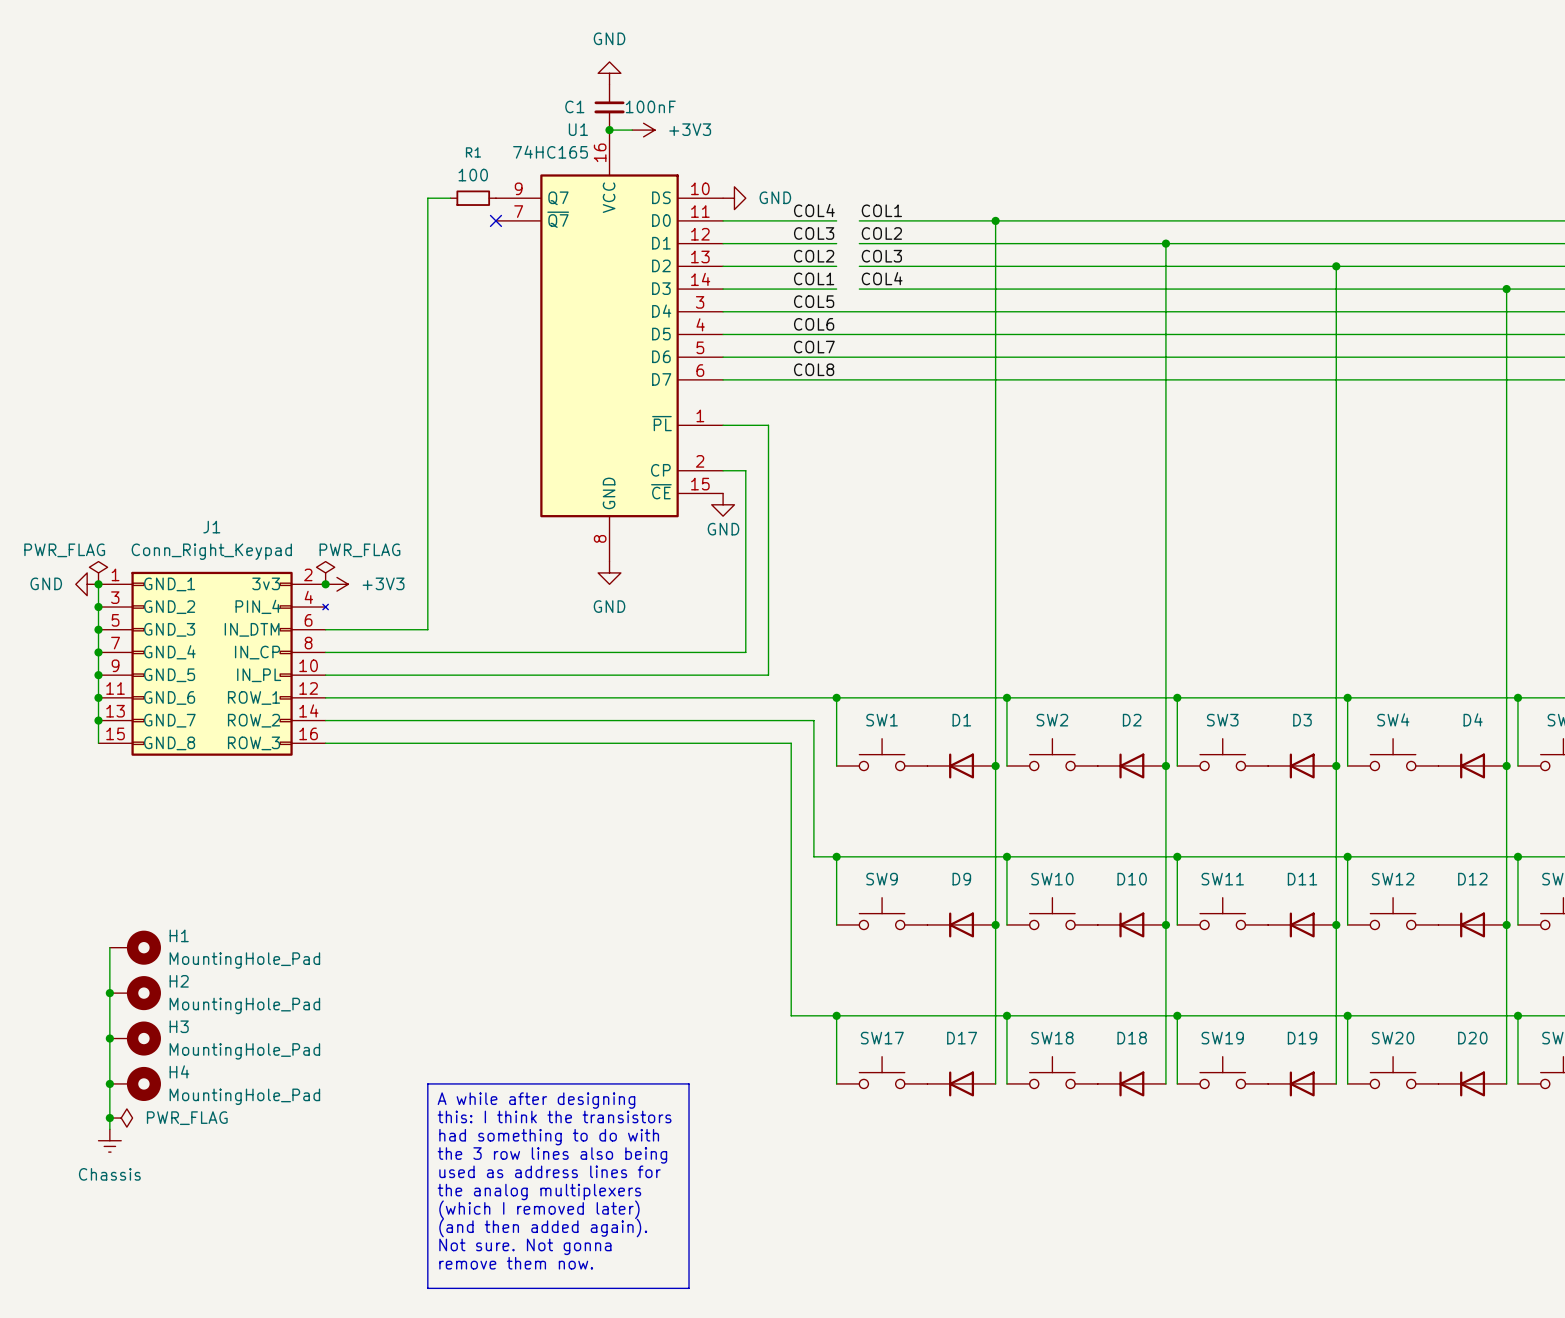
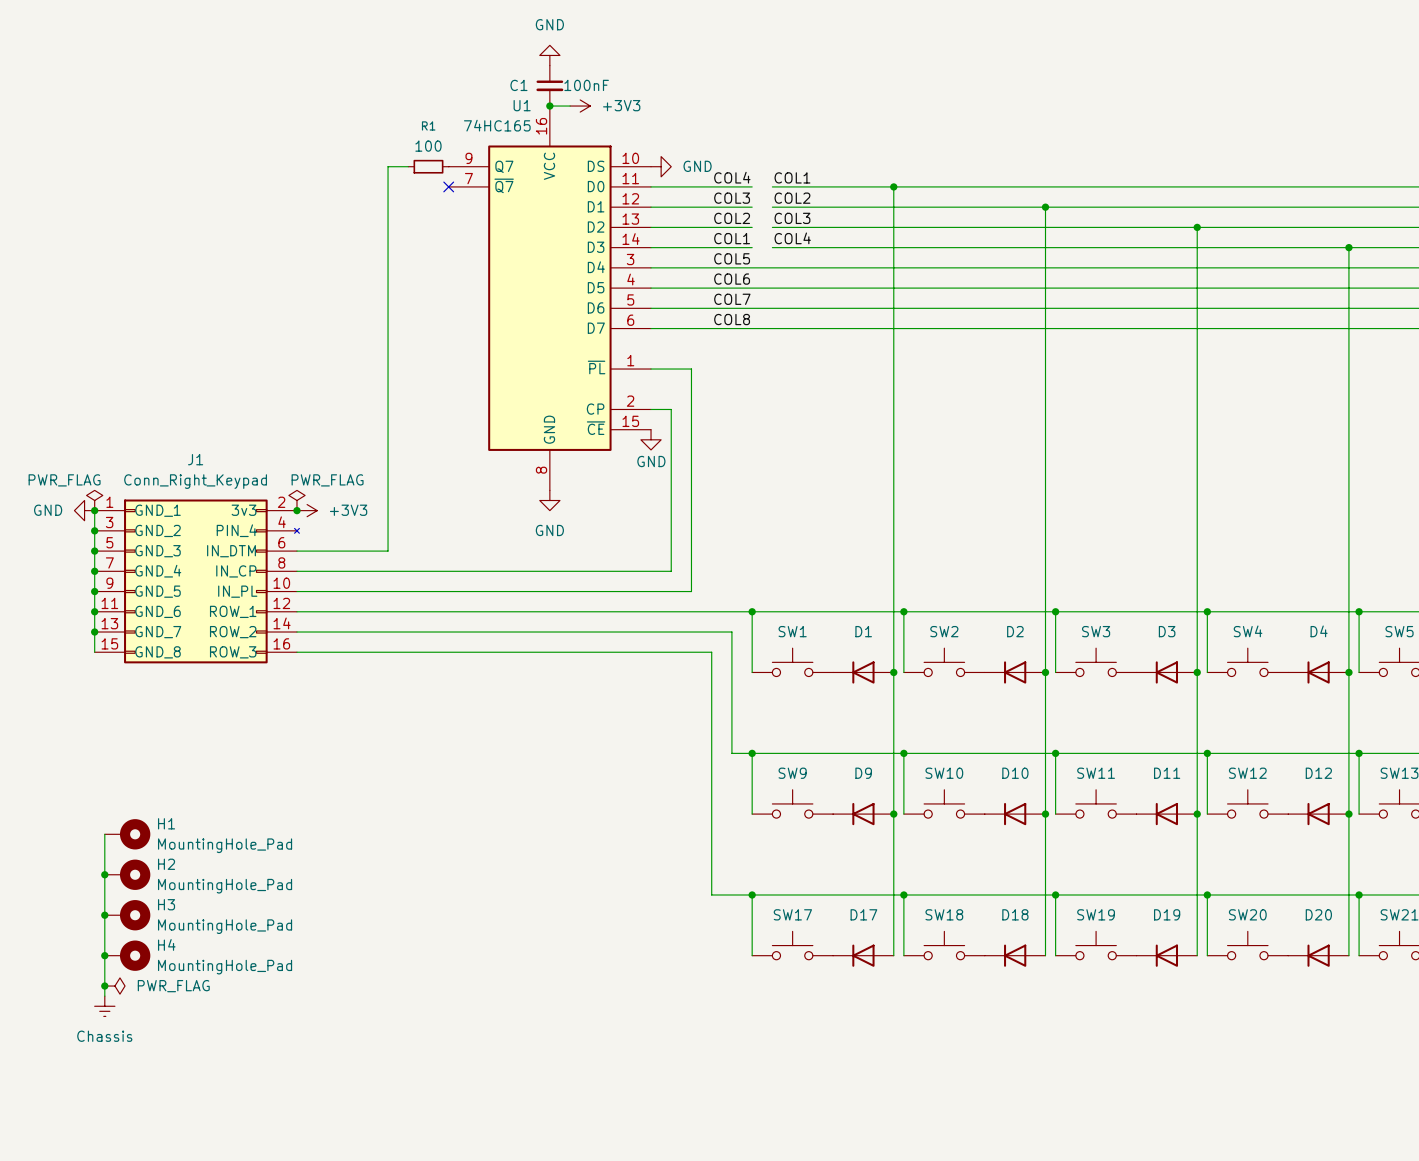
line: (427, 1083) (689, 1083) (689, 1288) (427, 1288) (427, 1083) -> none
text: A while after designing (536, 1100) -> none
text: this: I think the transistors (554, 1116) -> none
text: had something to do with (549, 1137) -> none
text: the 3 row lines also being (552, 1155) -> none
text: used as address lines for (549, 1171) -> none
text: the analog multiplexers (539, 1192) -> none
text: (which I removed later) (539, 1209) -> none
text: (and then added again). (543, 1228) -> none
text: Not sure. Not gonna (525, 1246) -> none
text: remove them now. (516, 1263) -> none

